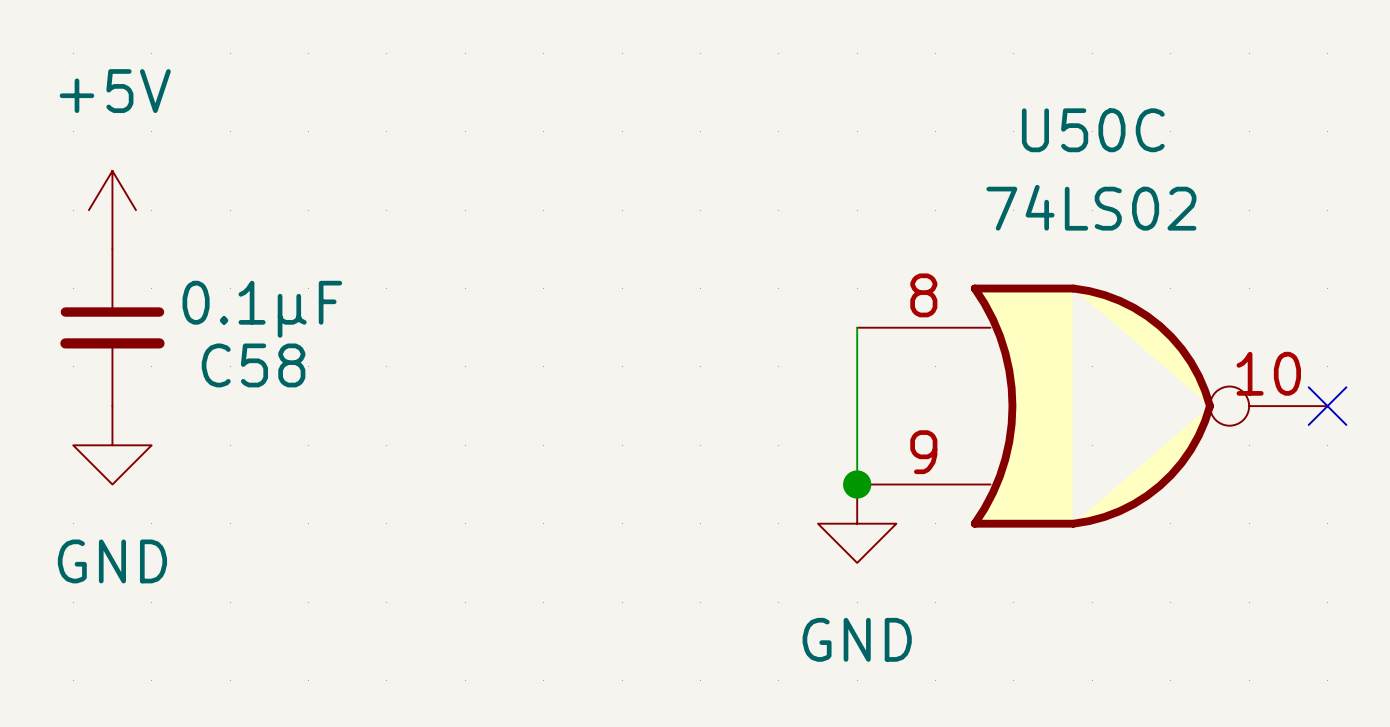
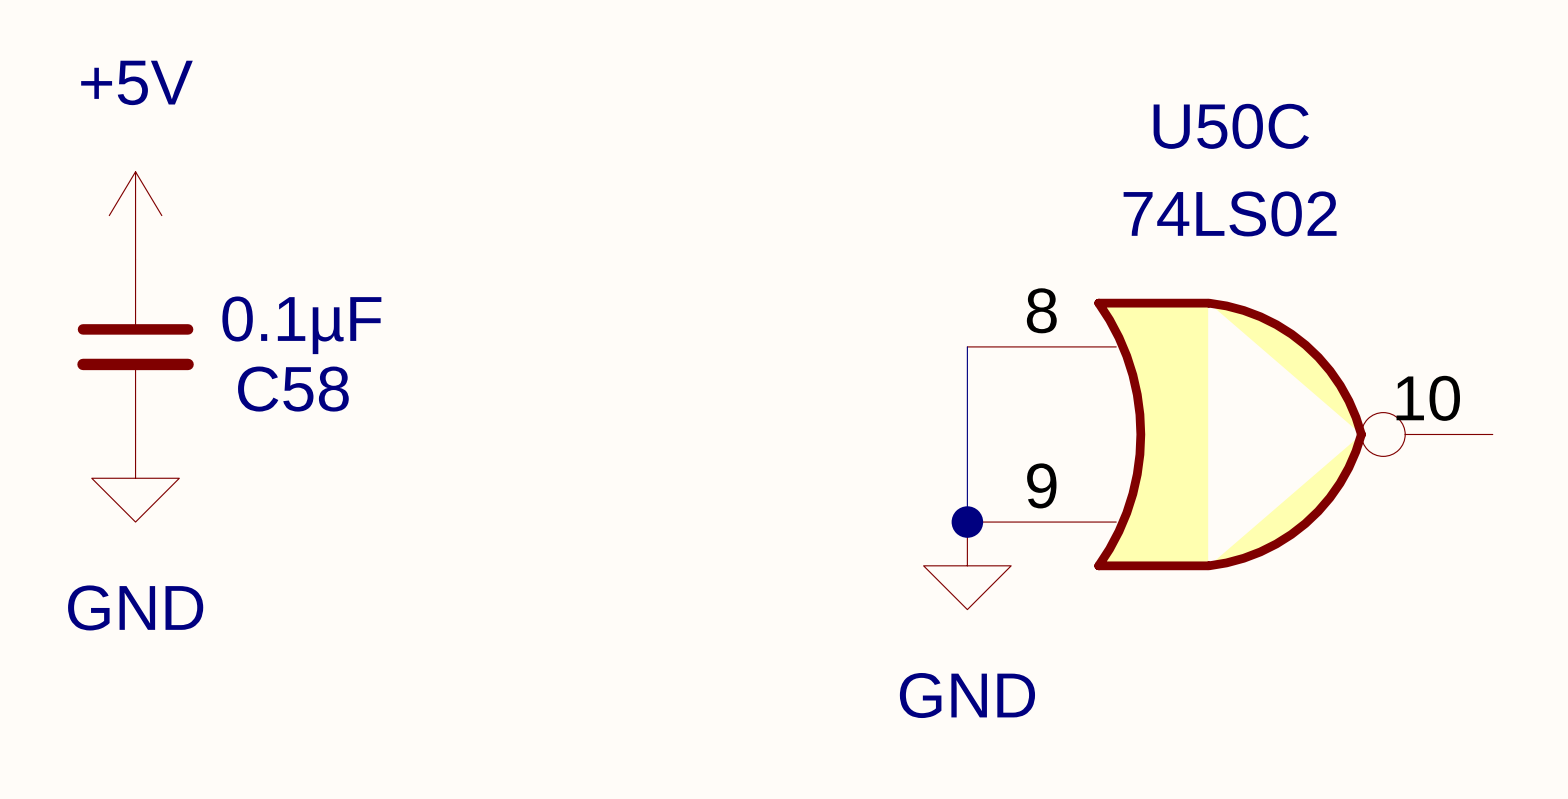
no-connect mark: (1327, 406) -> none

